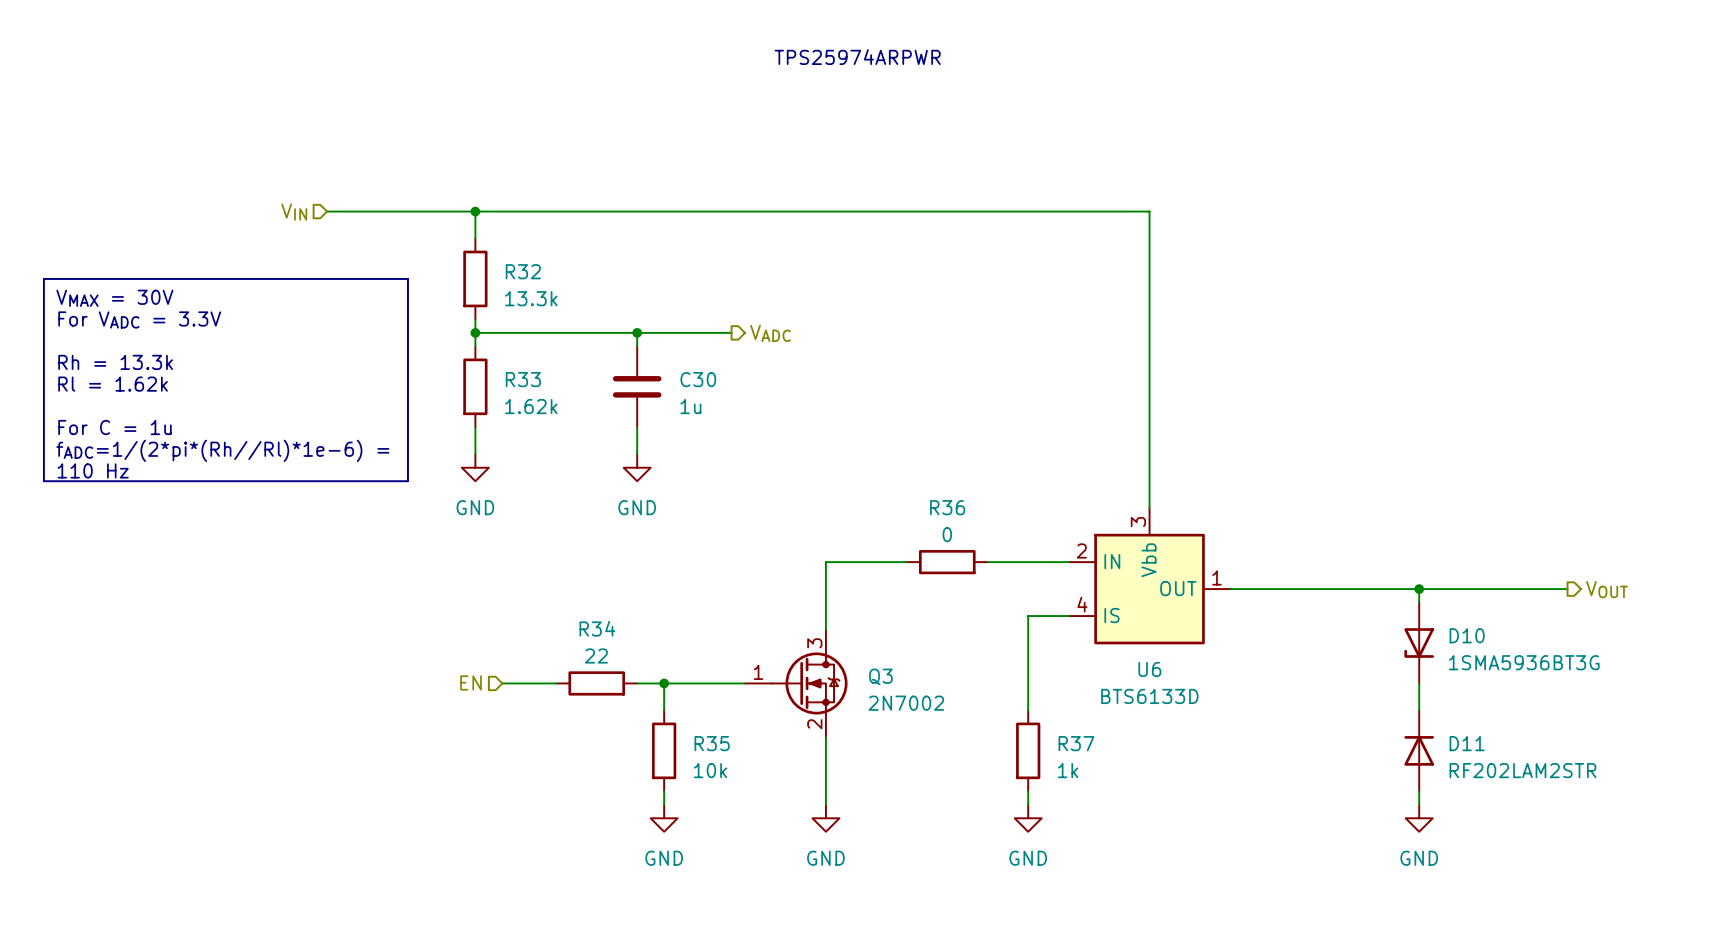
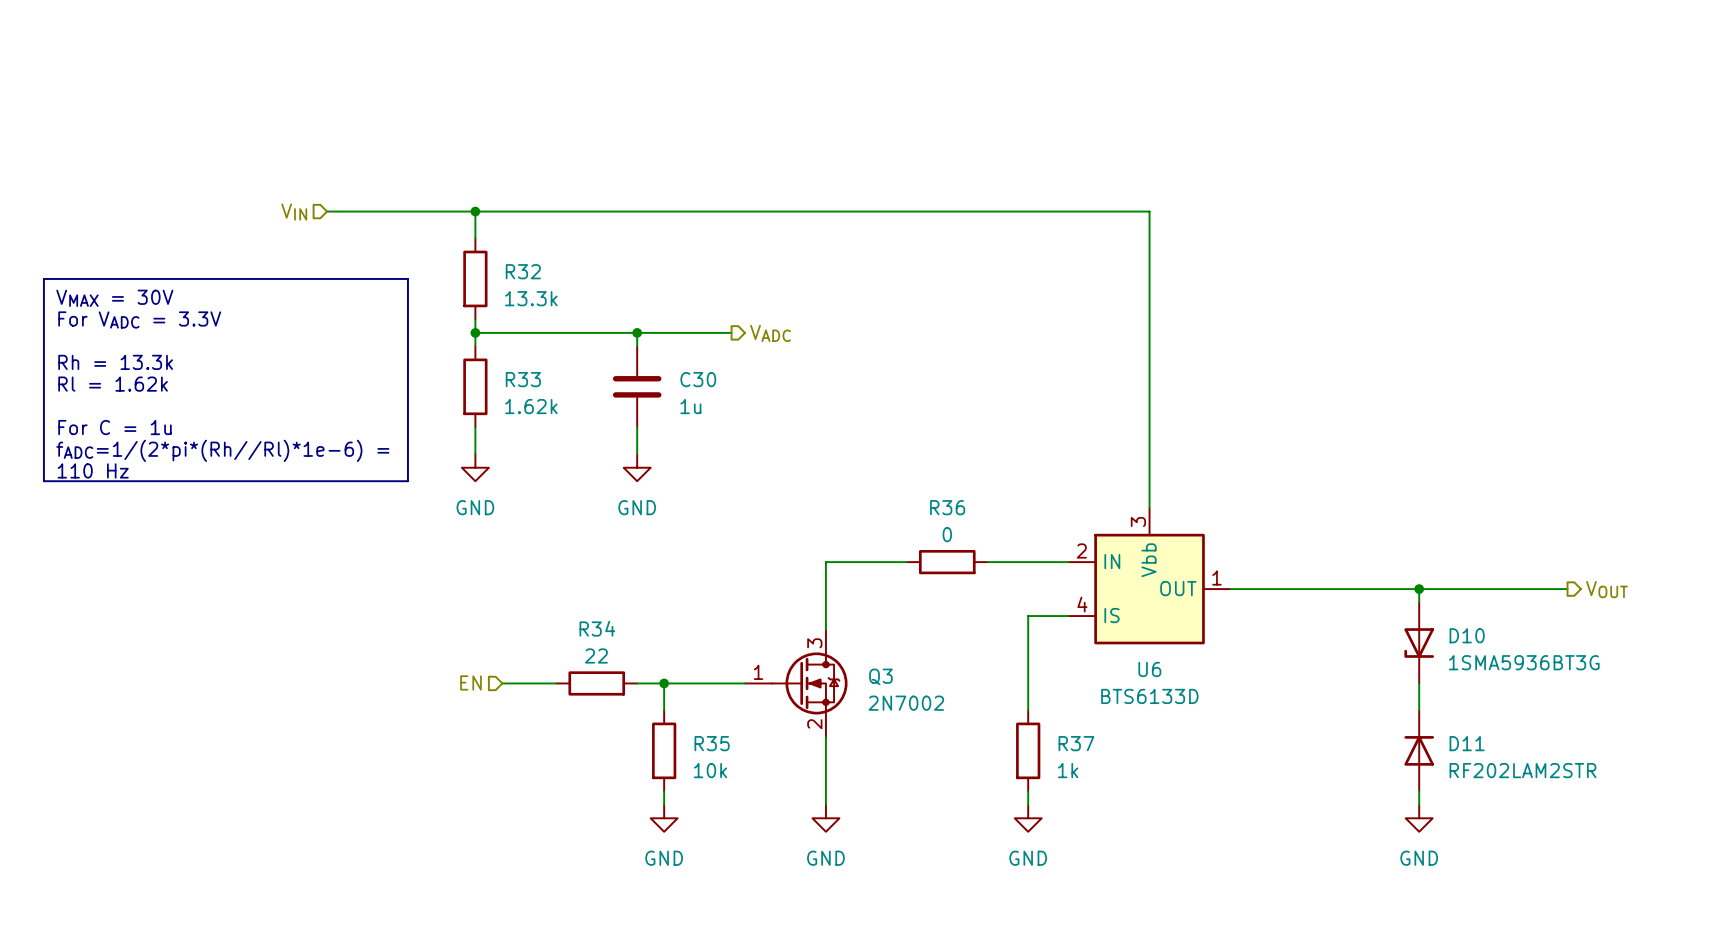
text: TPS25974ARPWR (857, 57) -> none

